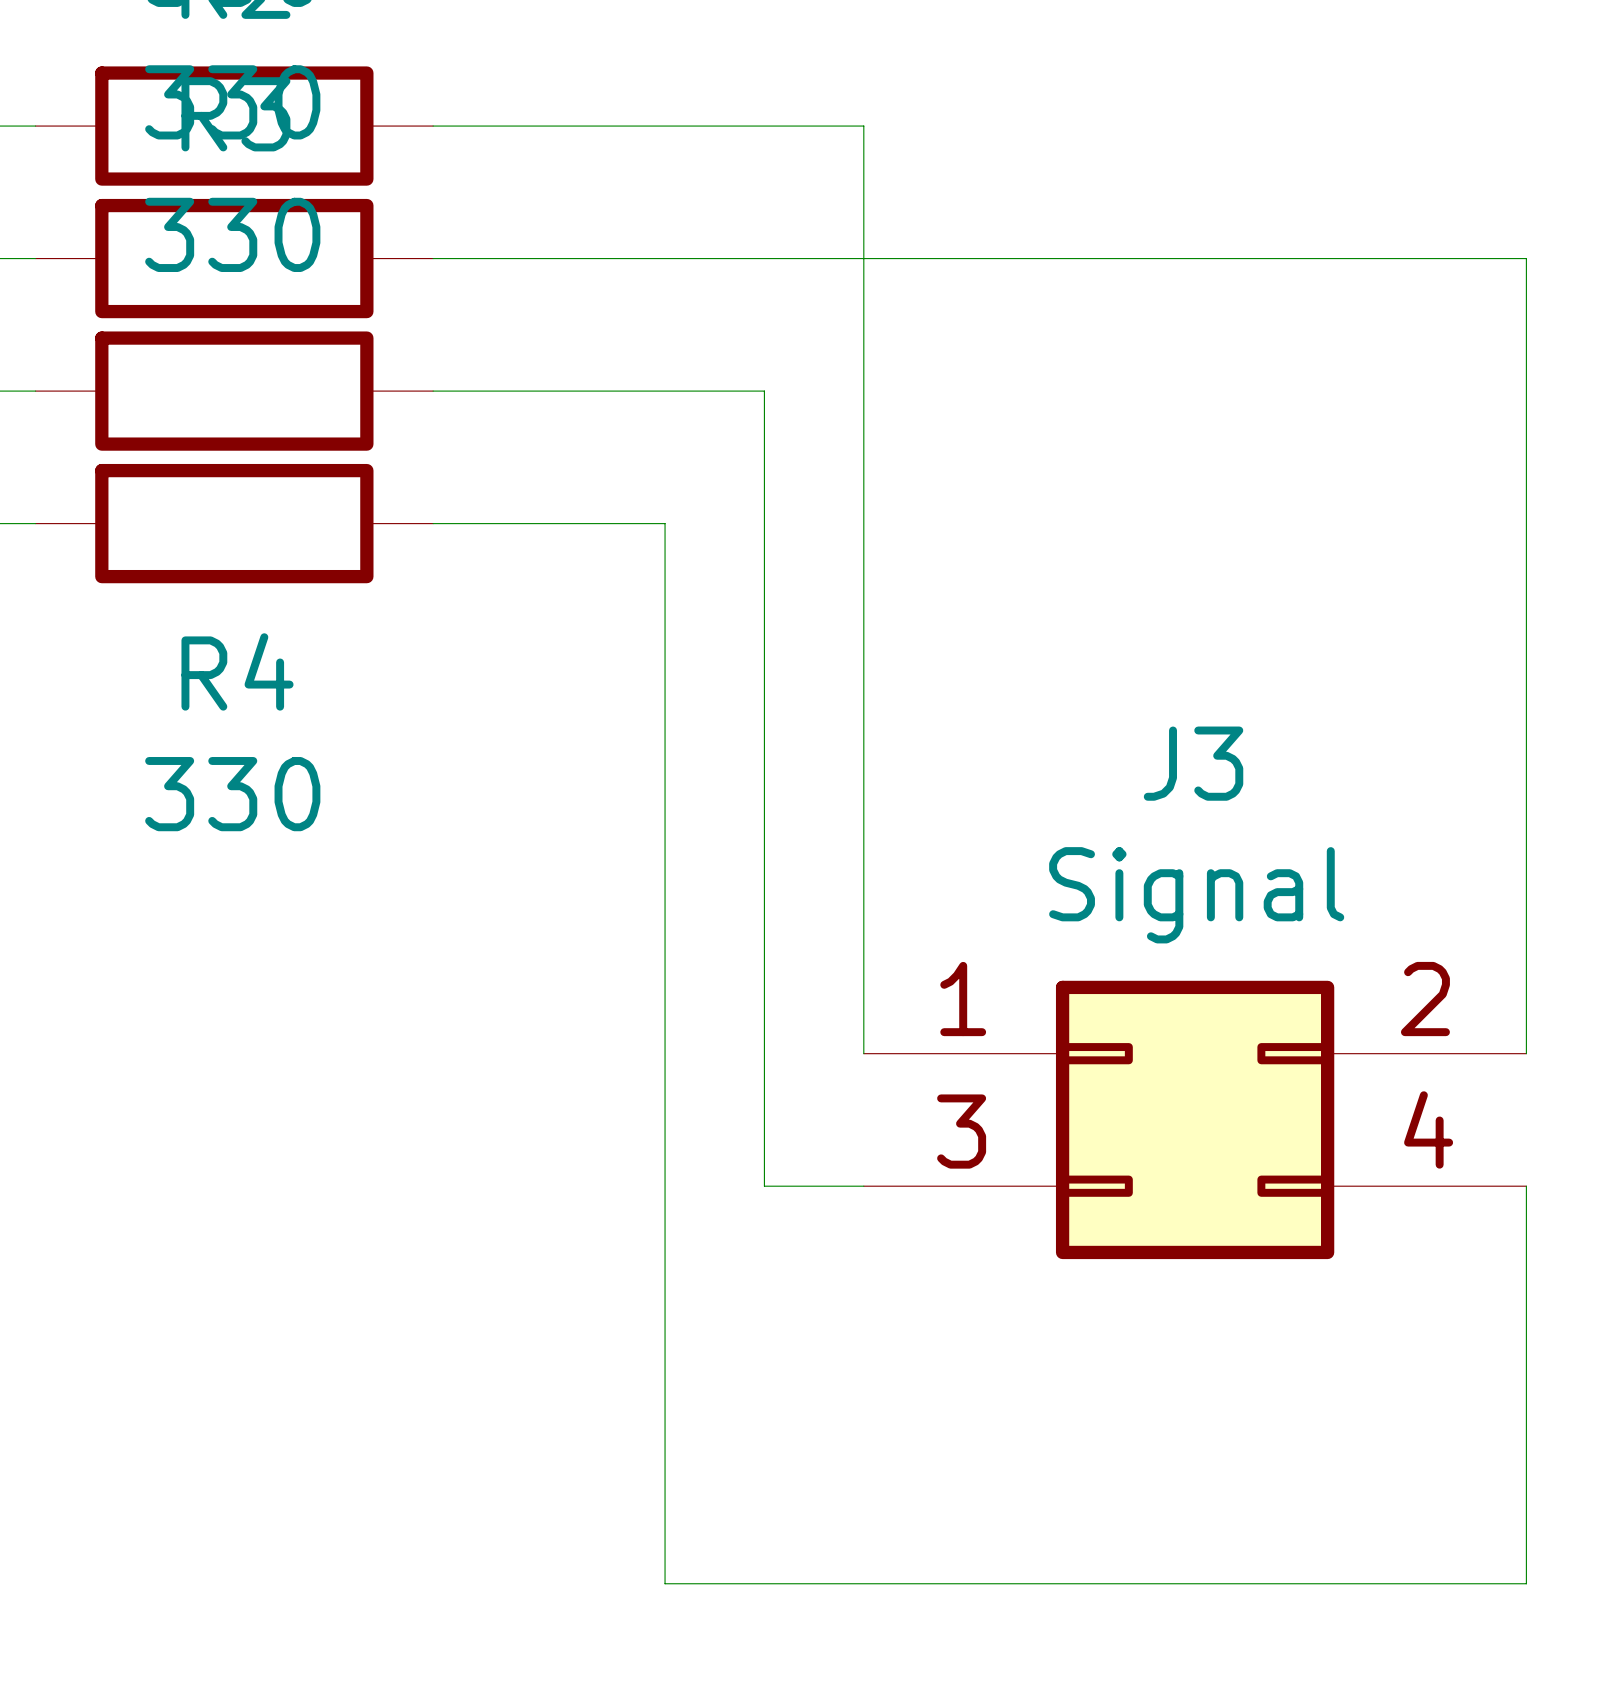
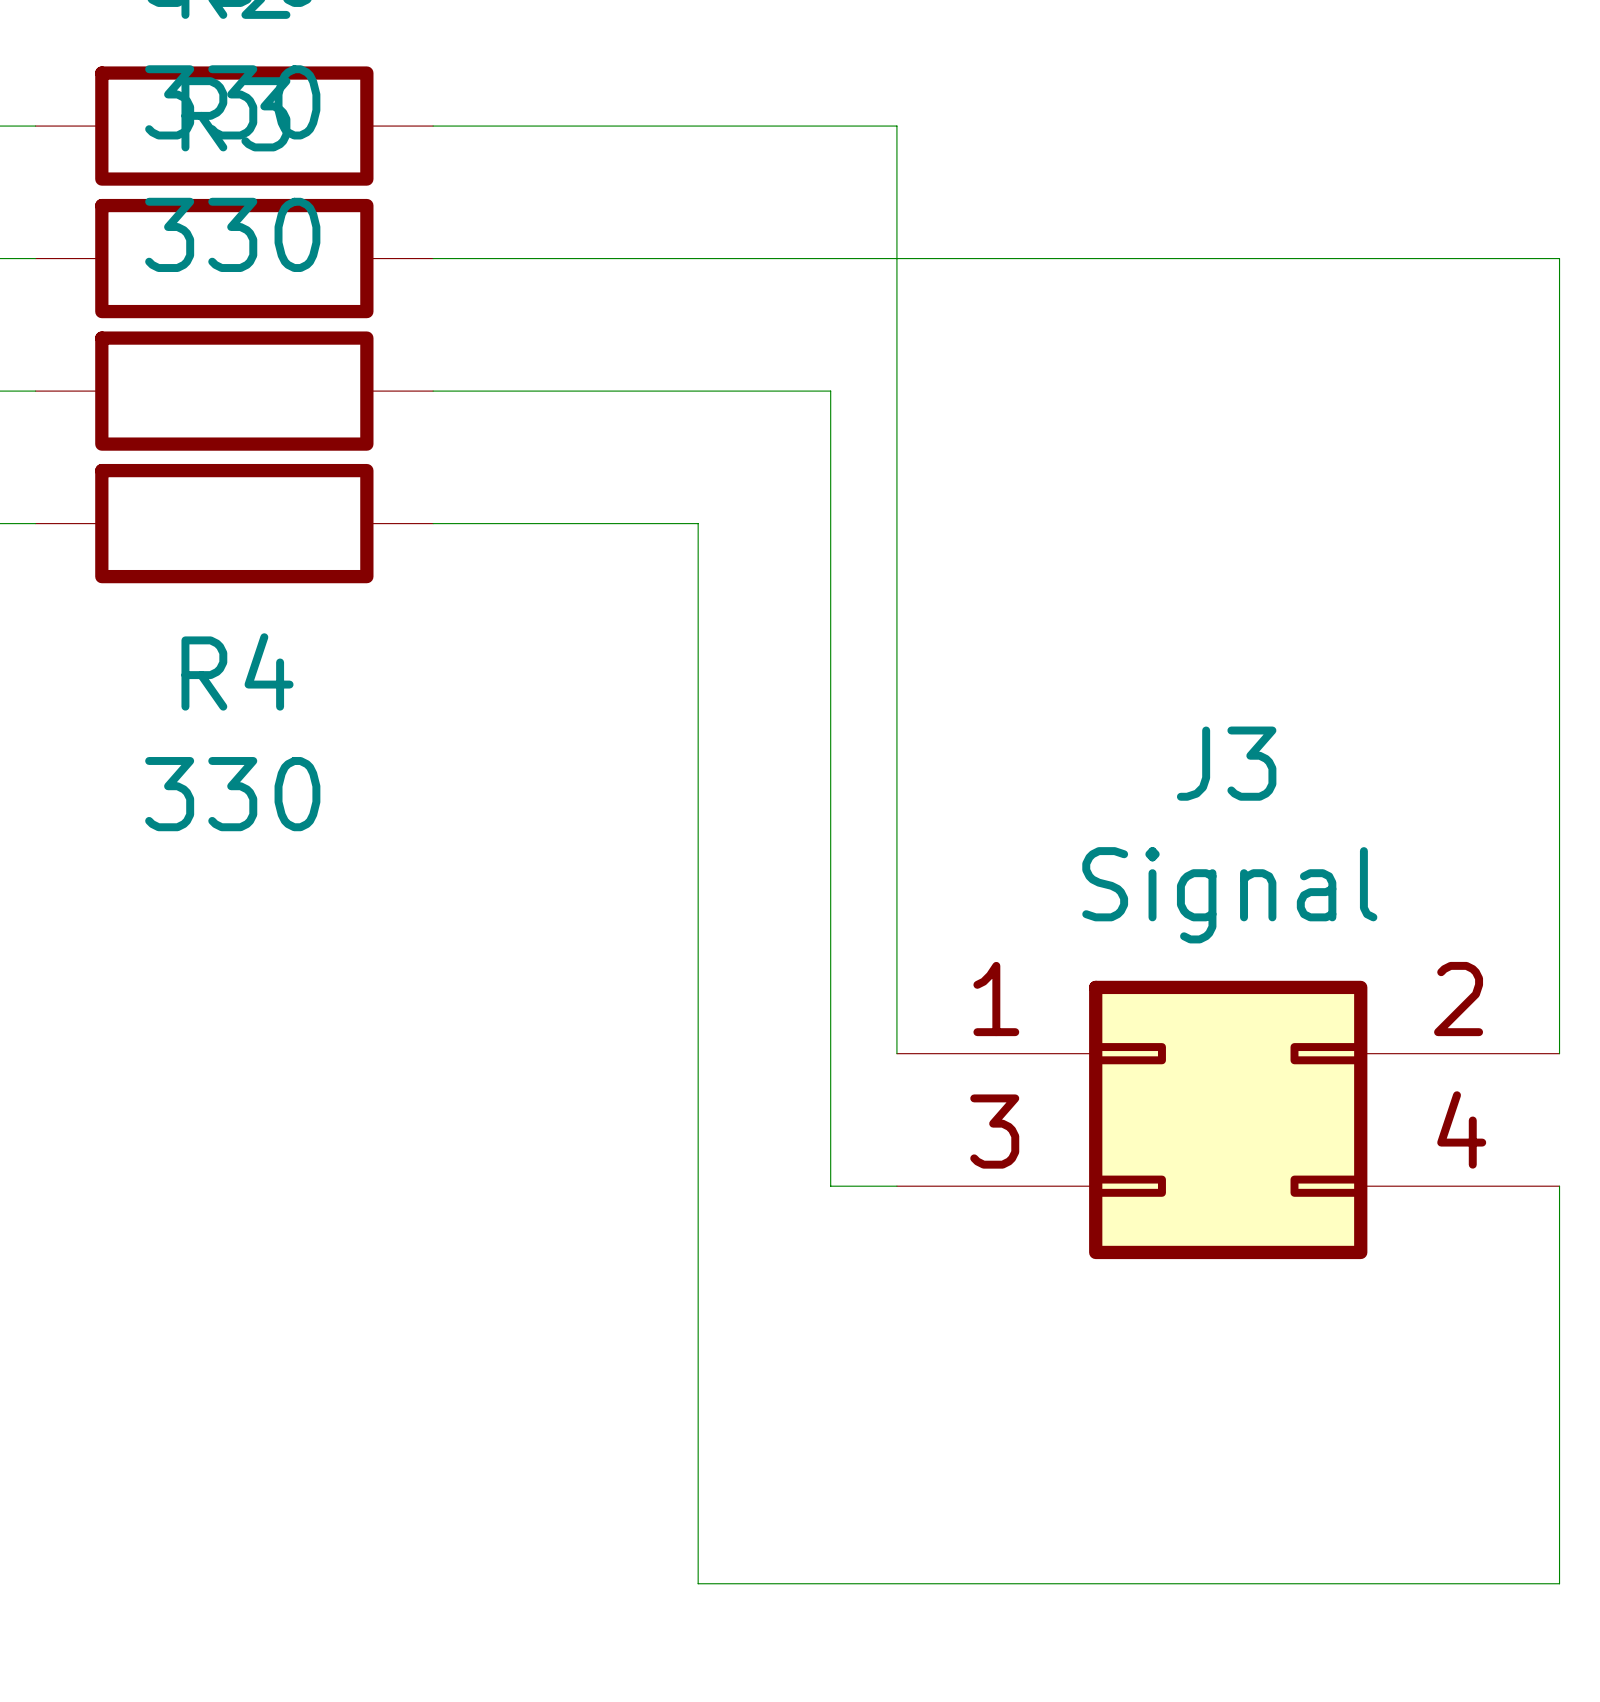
wire: (863, 126) (863, 1053) -> (863, 126) (896, 126) (896, 1053)
wire: (1526, 258) (1526, 1053) -> (1526, 258) (1559, 258) (1559, 1053)
wire: (764, 391) (764, 1186) (830, 1186) -> (764, 391) (830, 391) (830, 1186)
wire: (665, 523) (665, 1583) (698, 1583) -> (665, 523) (698, 523) (698, 1583)
J3 position: (1195, 1119) -> (1228, 1119)
wire: (1526, 1186) (1526, 1583) -> (1559, 1186) (1559, 1583) (1526, 1583)

